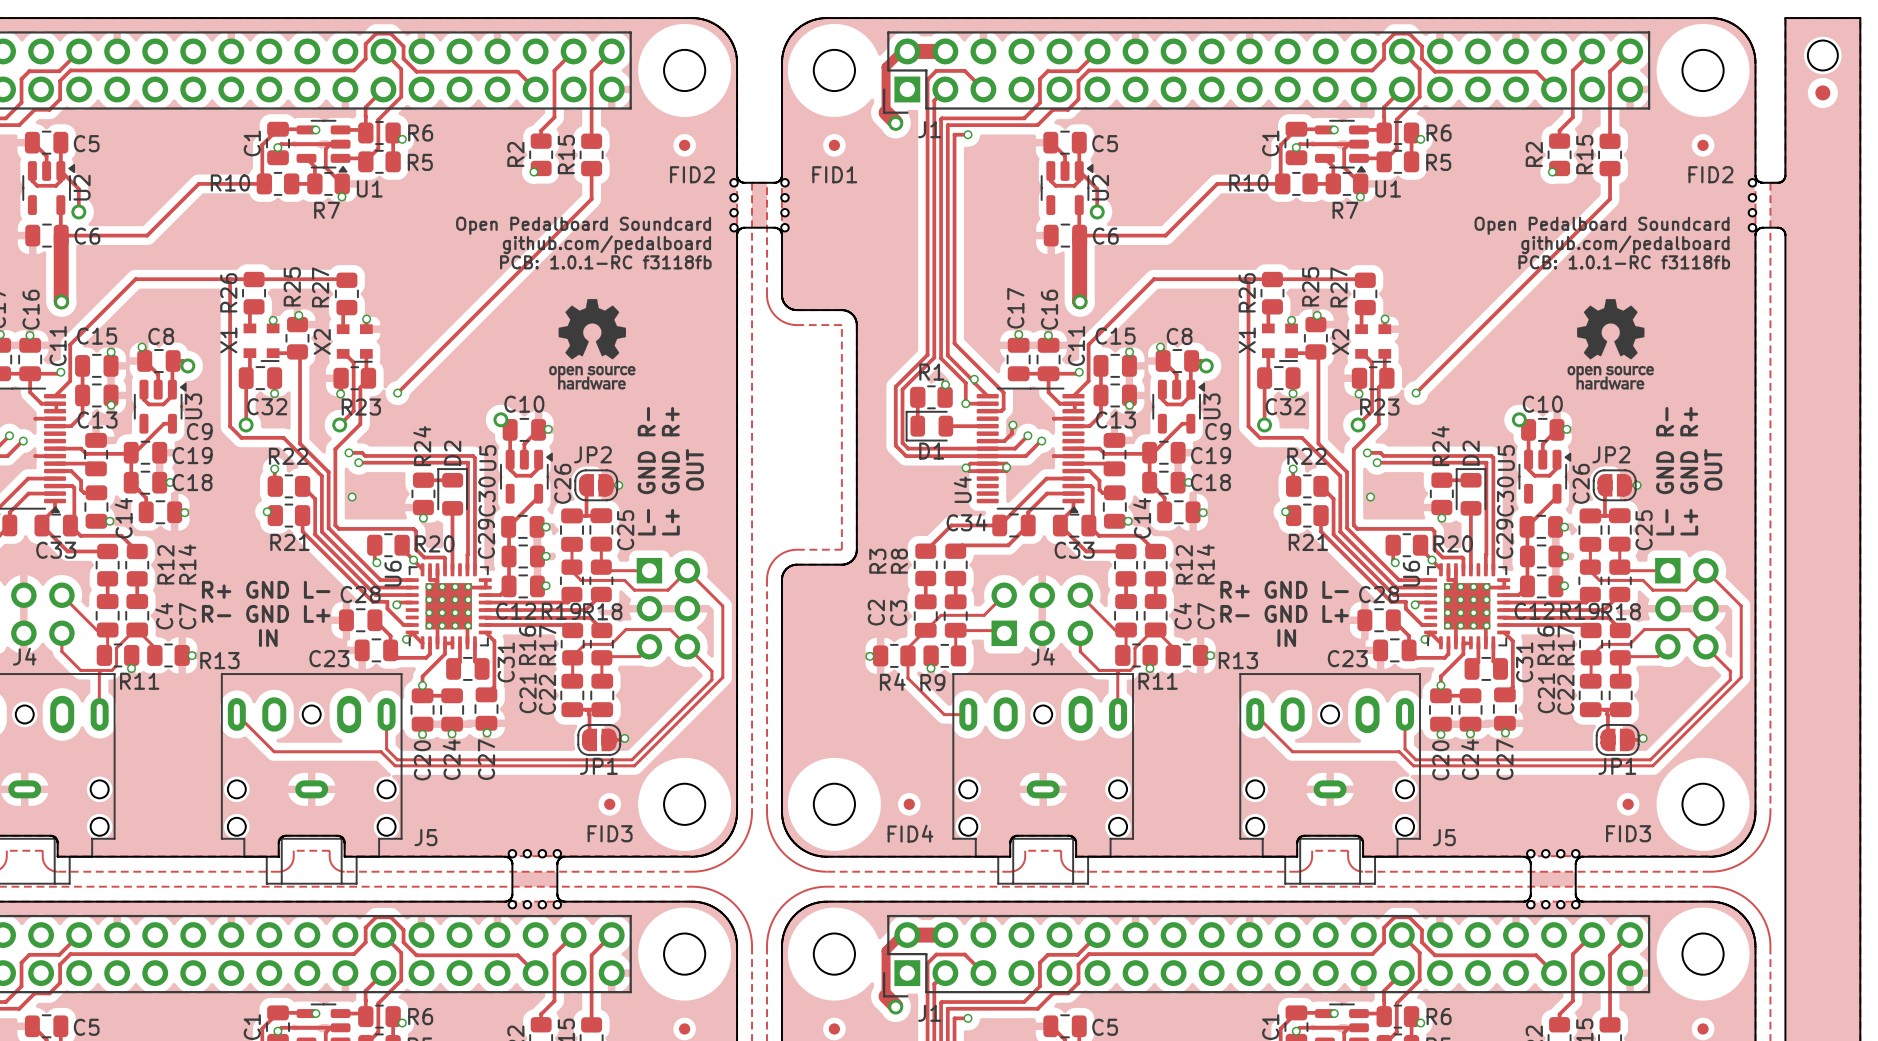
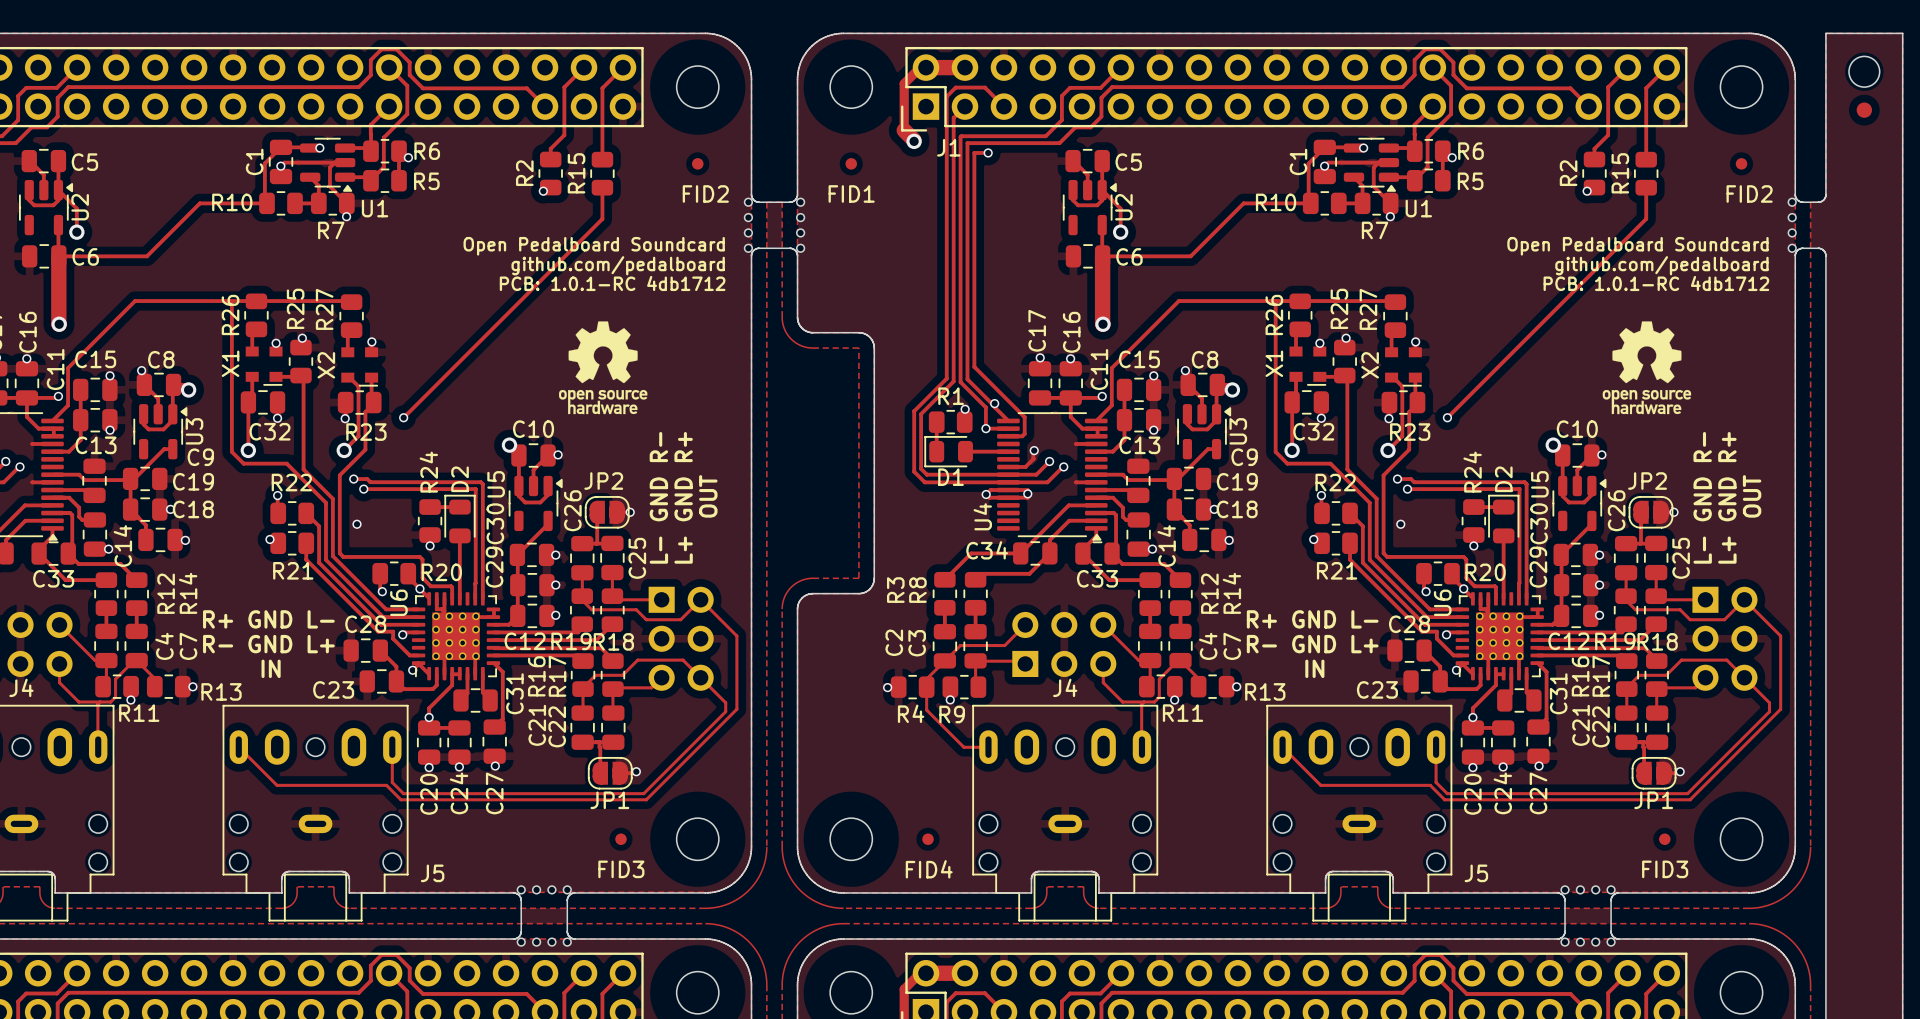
text: PCB: 1.0.1-RC f3118fb (605, 262) -> PCB: 1.0.1-RC 4db1712 (612, 283)
text: PCB: 1.0.1-RC f3118fb (1624, 262) -> PCB: 1.0.1-RC 4db1712 (1656, 283)

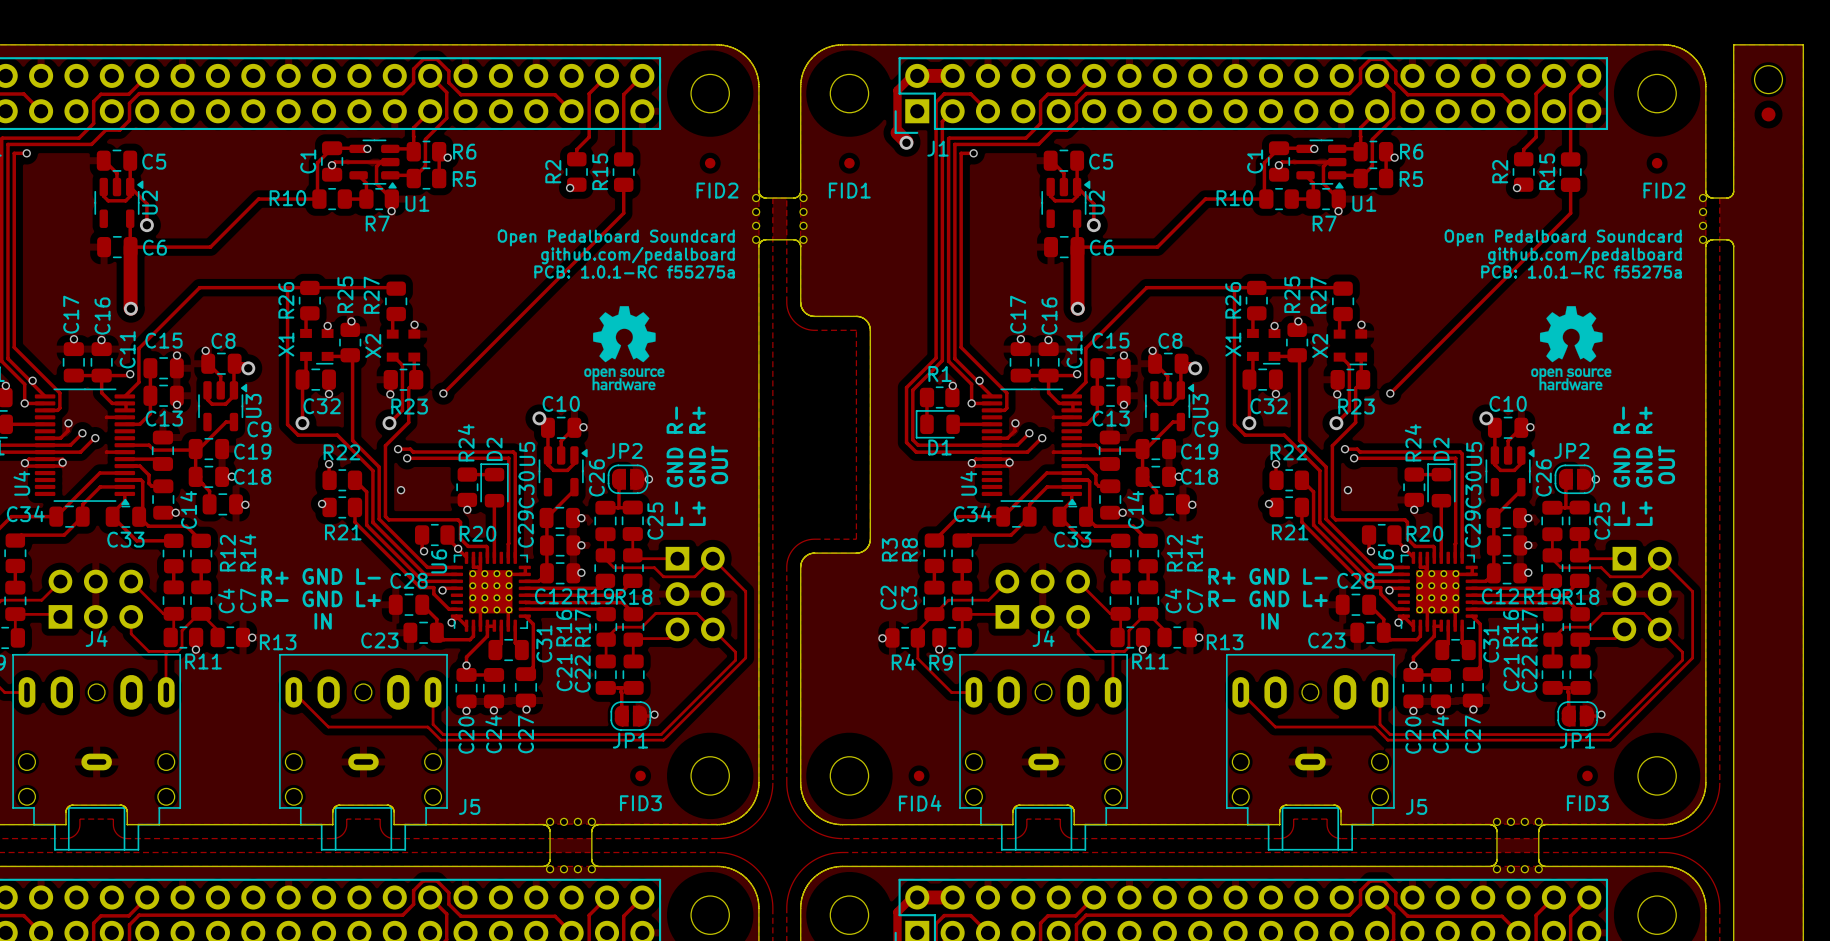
text: PCB: 1.0.1-RC 4db1712 (612, 283) -> PCB: 1.0.1-RC f55275a (634, 271)
text: PCB: 1.0.1-RC 4db1712 (1656, 283) -> PCB: 1.0.1-RC f55275a (1581, 271)

